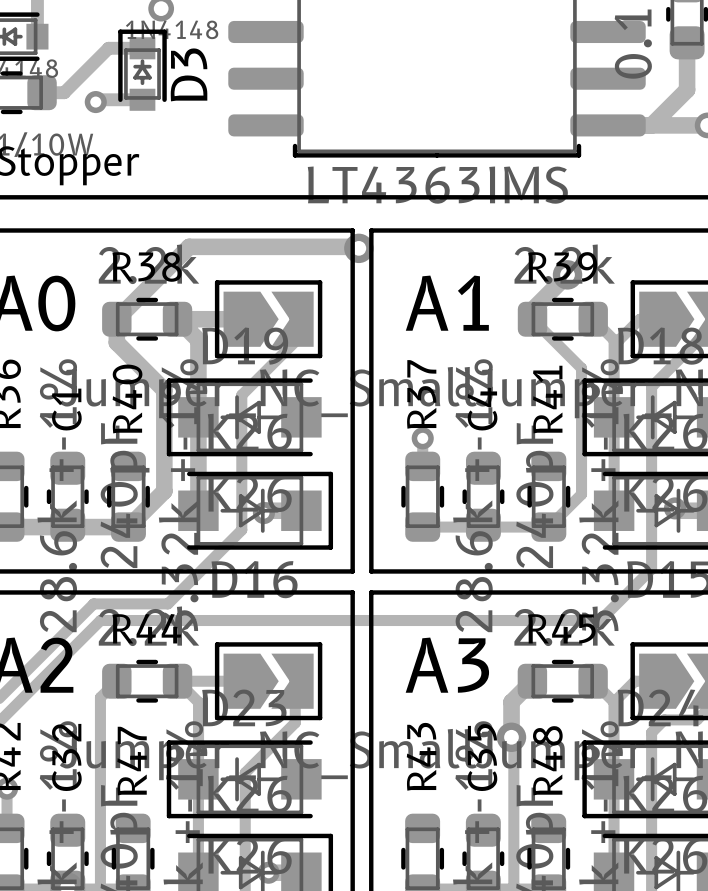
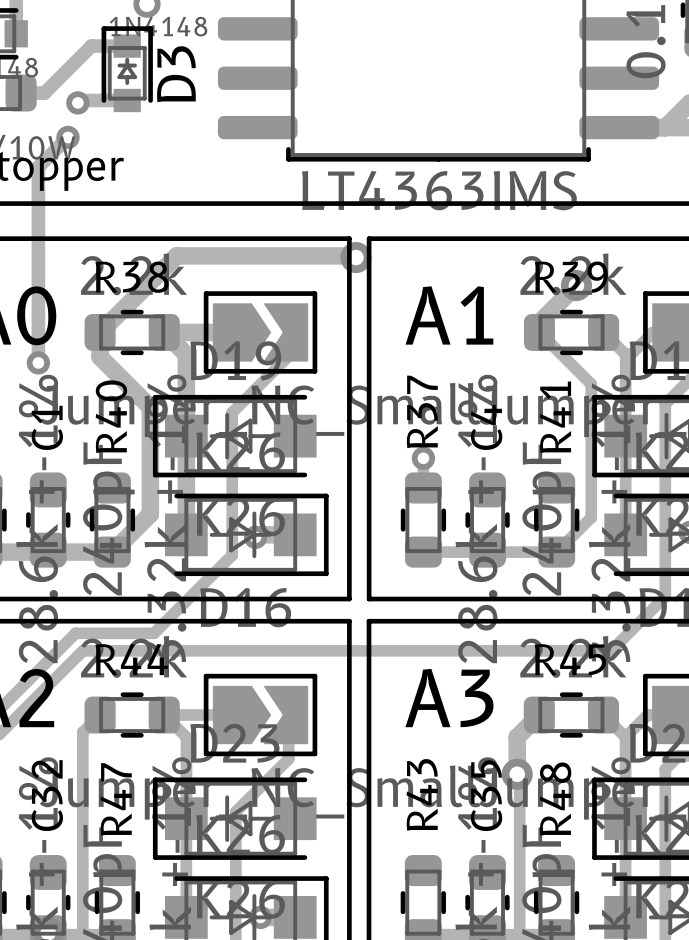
track: none -> (68, 137) (38, 167) (38, 362)
via: none -> (68, 137)
via: none -> (38, 362)

